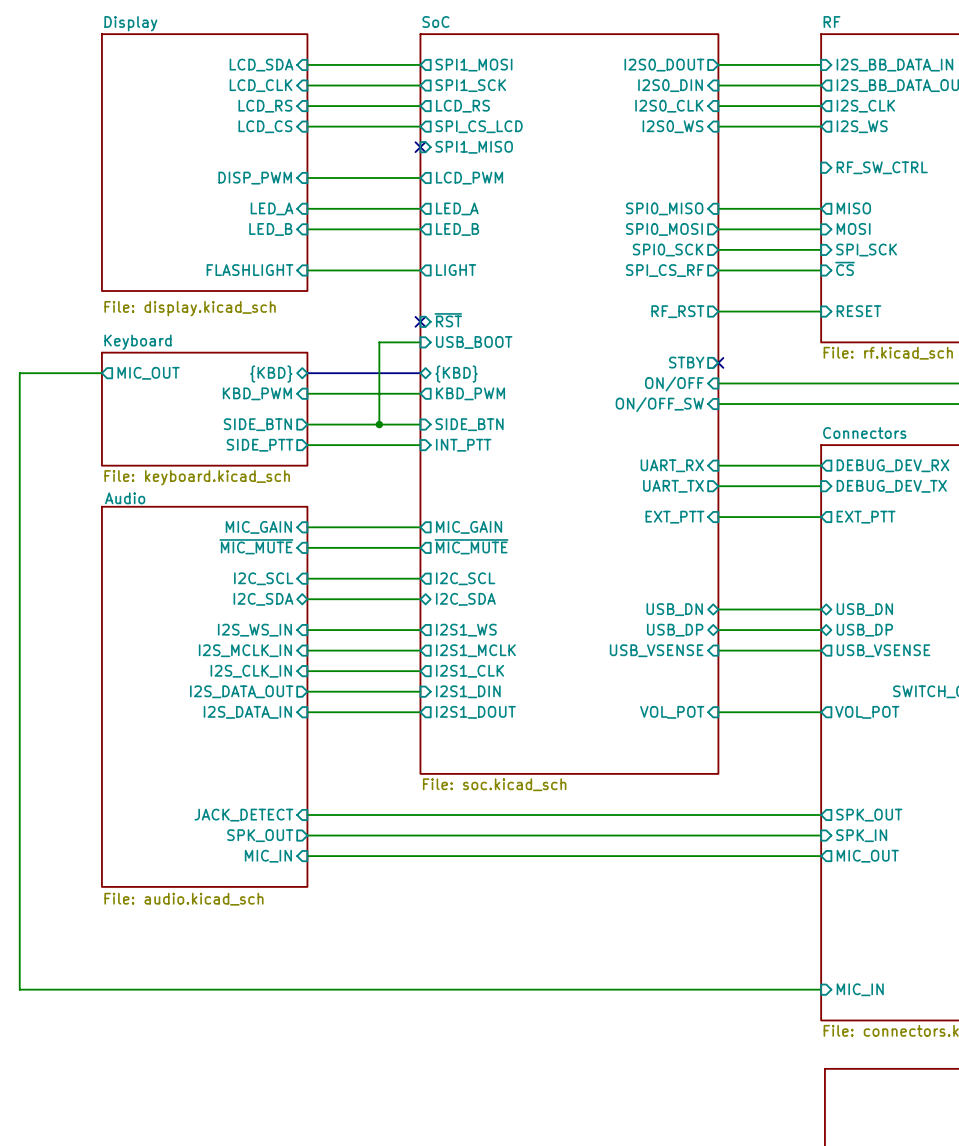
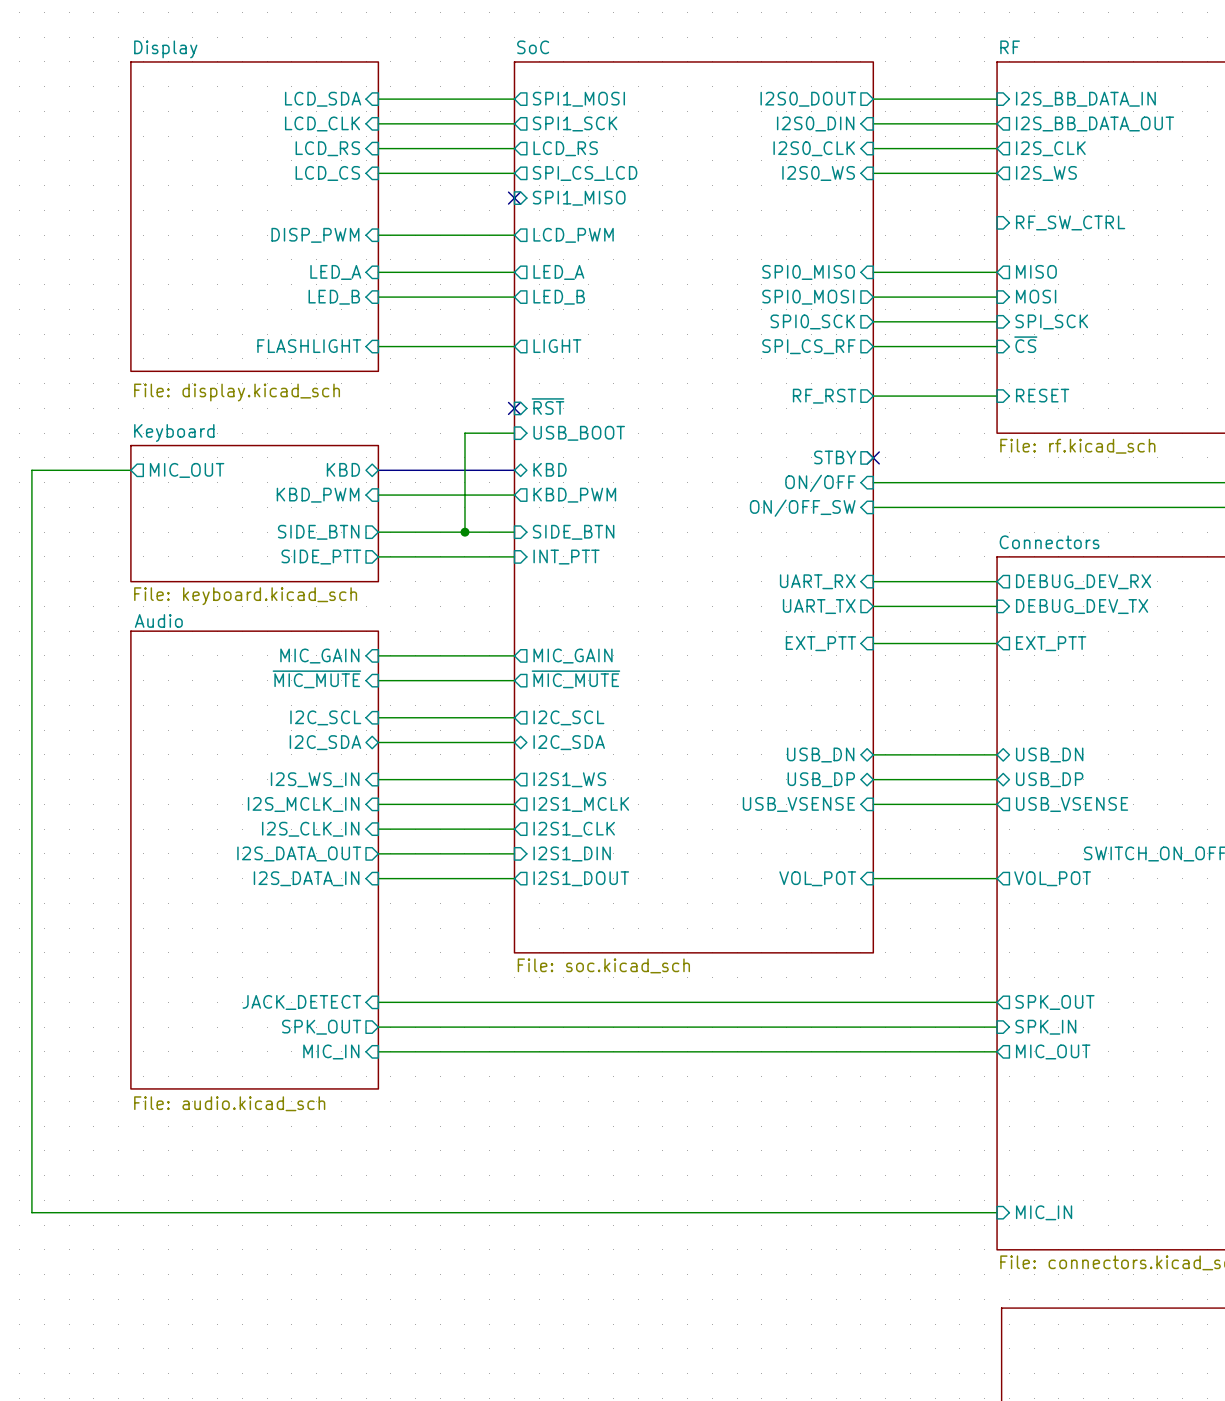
sheet pin: {KBD} (271, 374) -> KBD (343, 469)
sheet pin: {KBD} (456, 374) -> KBD (550, 469)

